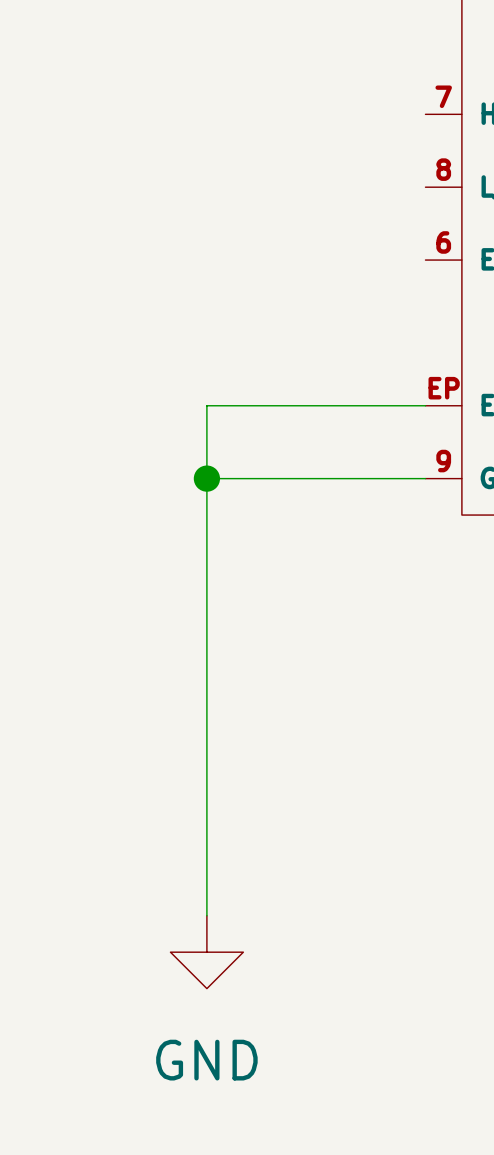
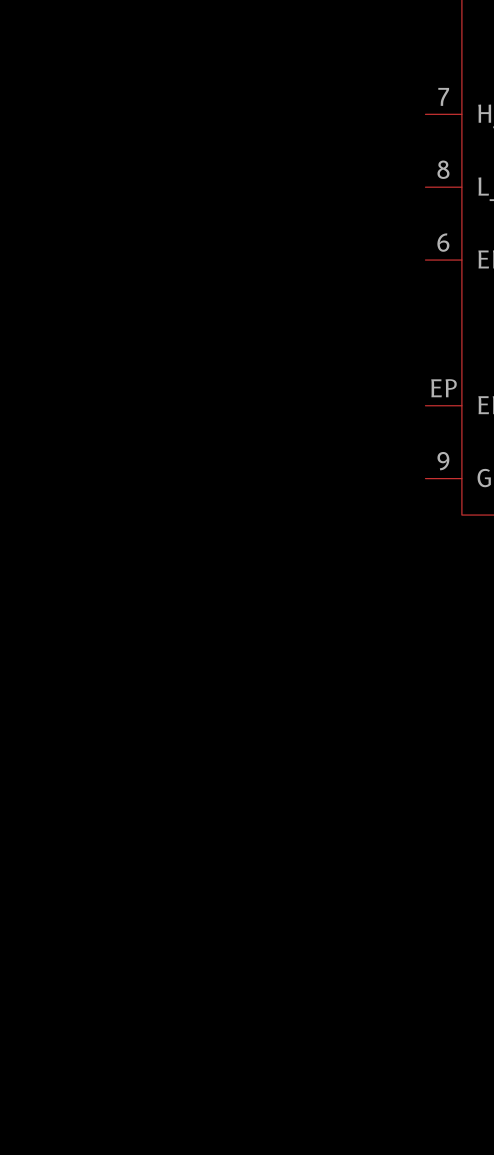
wire: (425, 405) (206, 405) (206, 915) -> none
wire: (206, 478) (425, 478) -> none
junction: (206, 478) -> none
power symbol: GND (206, 952) -> none

